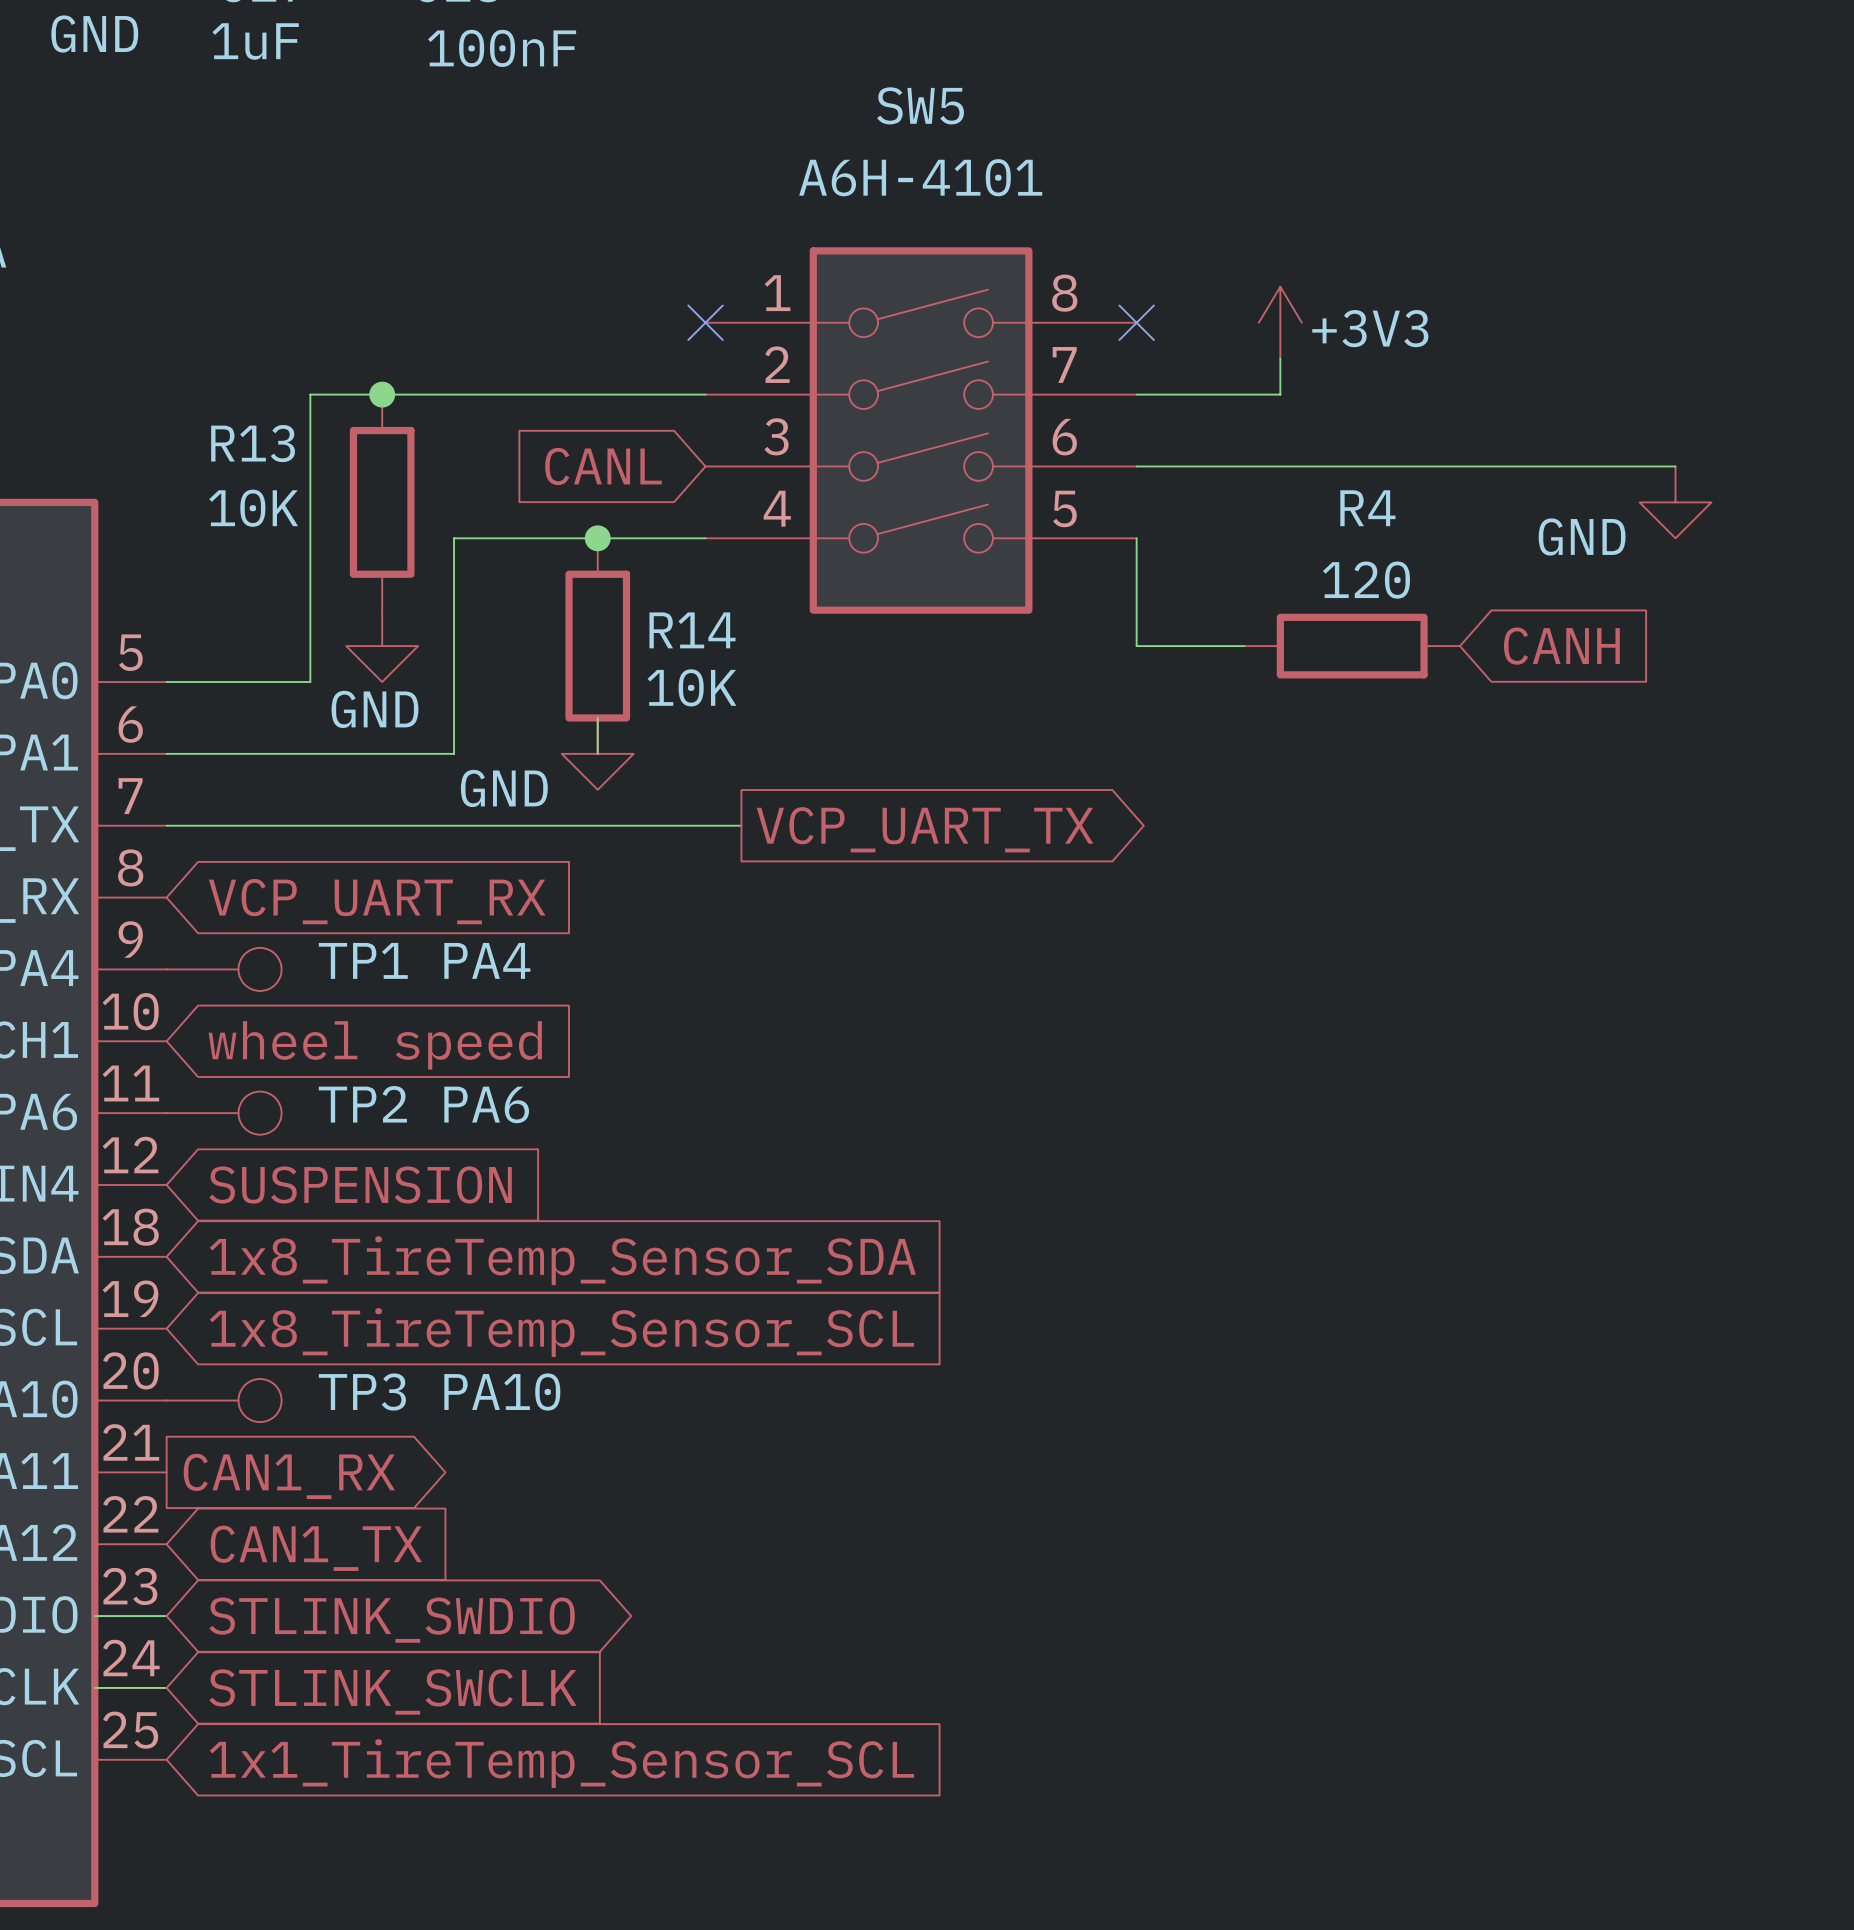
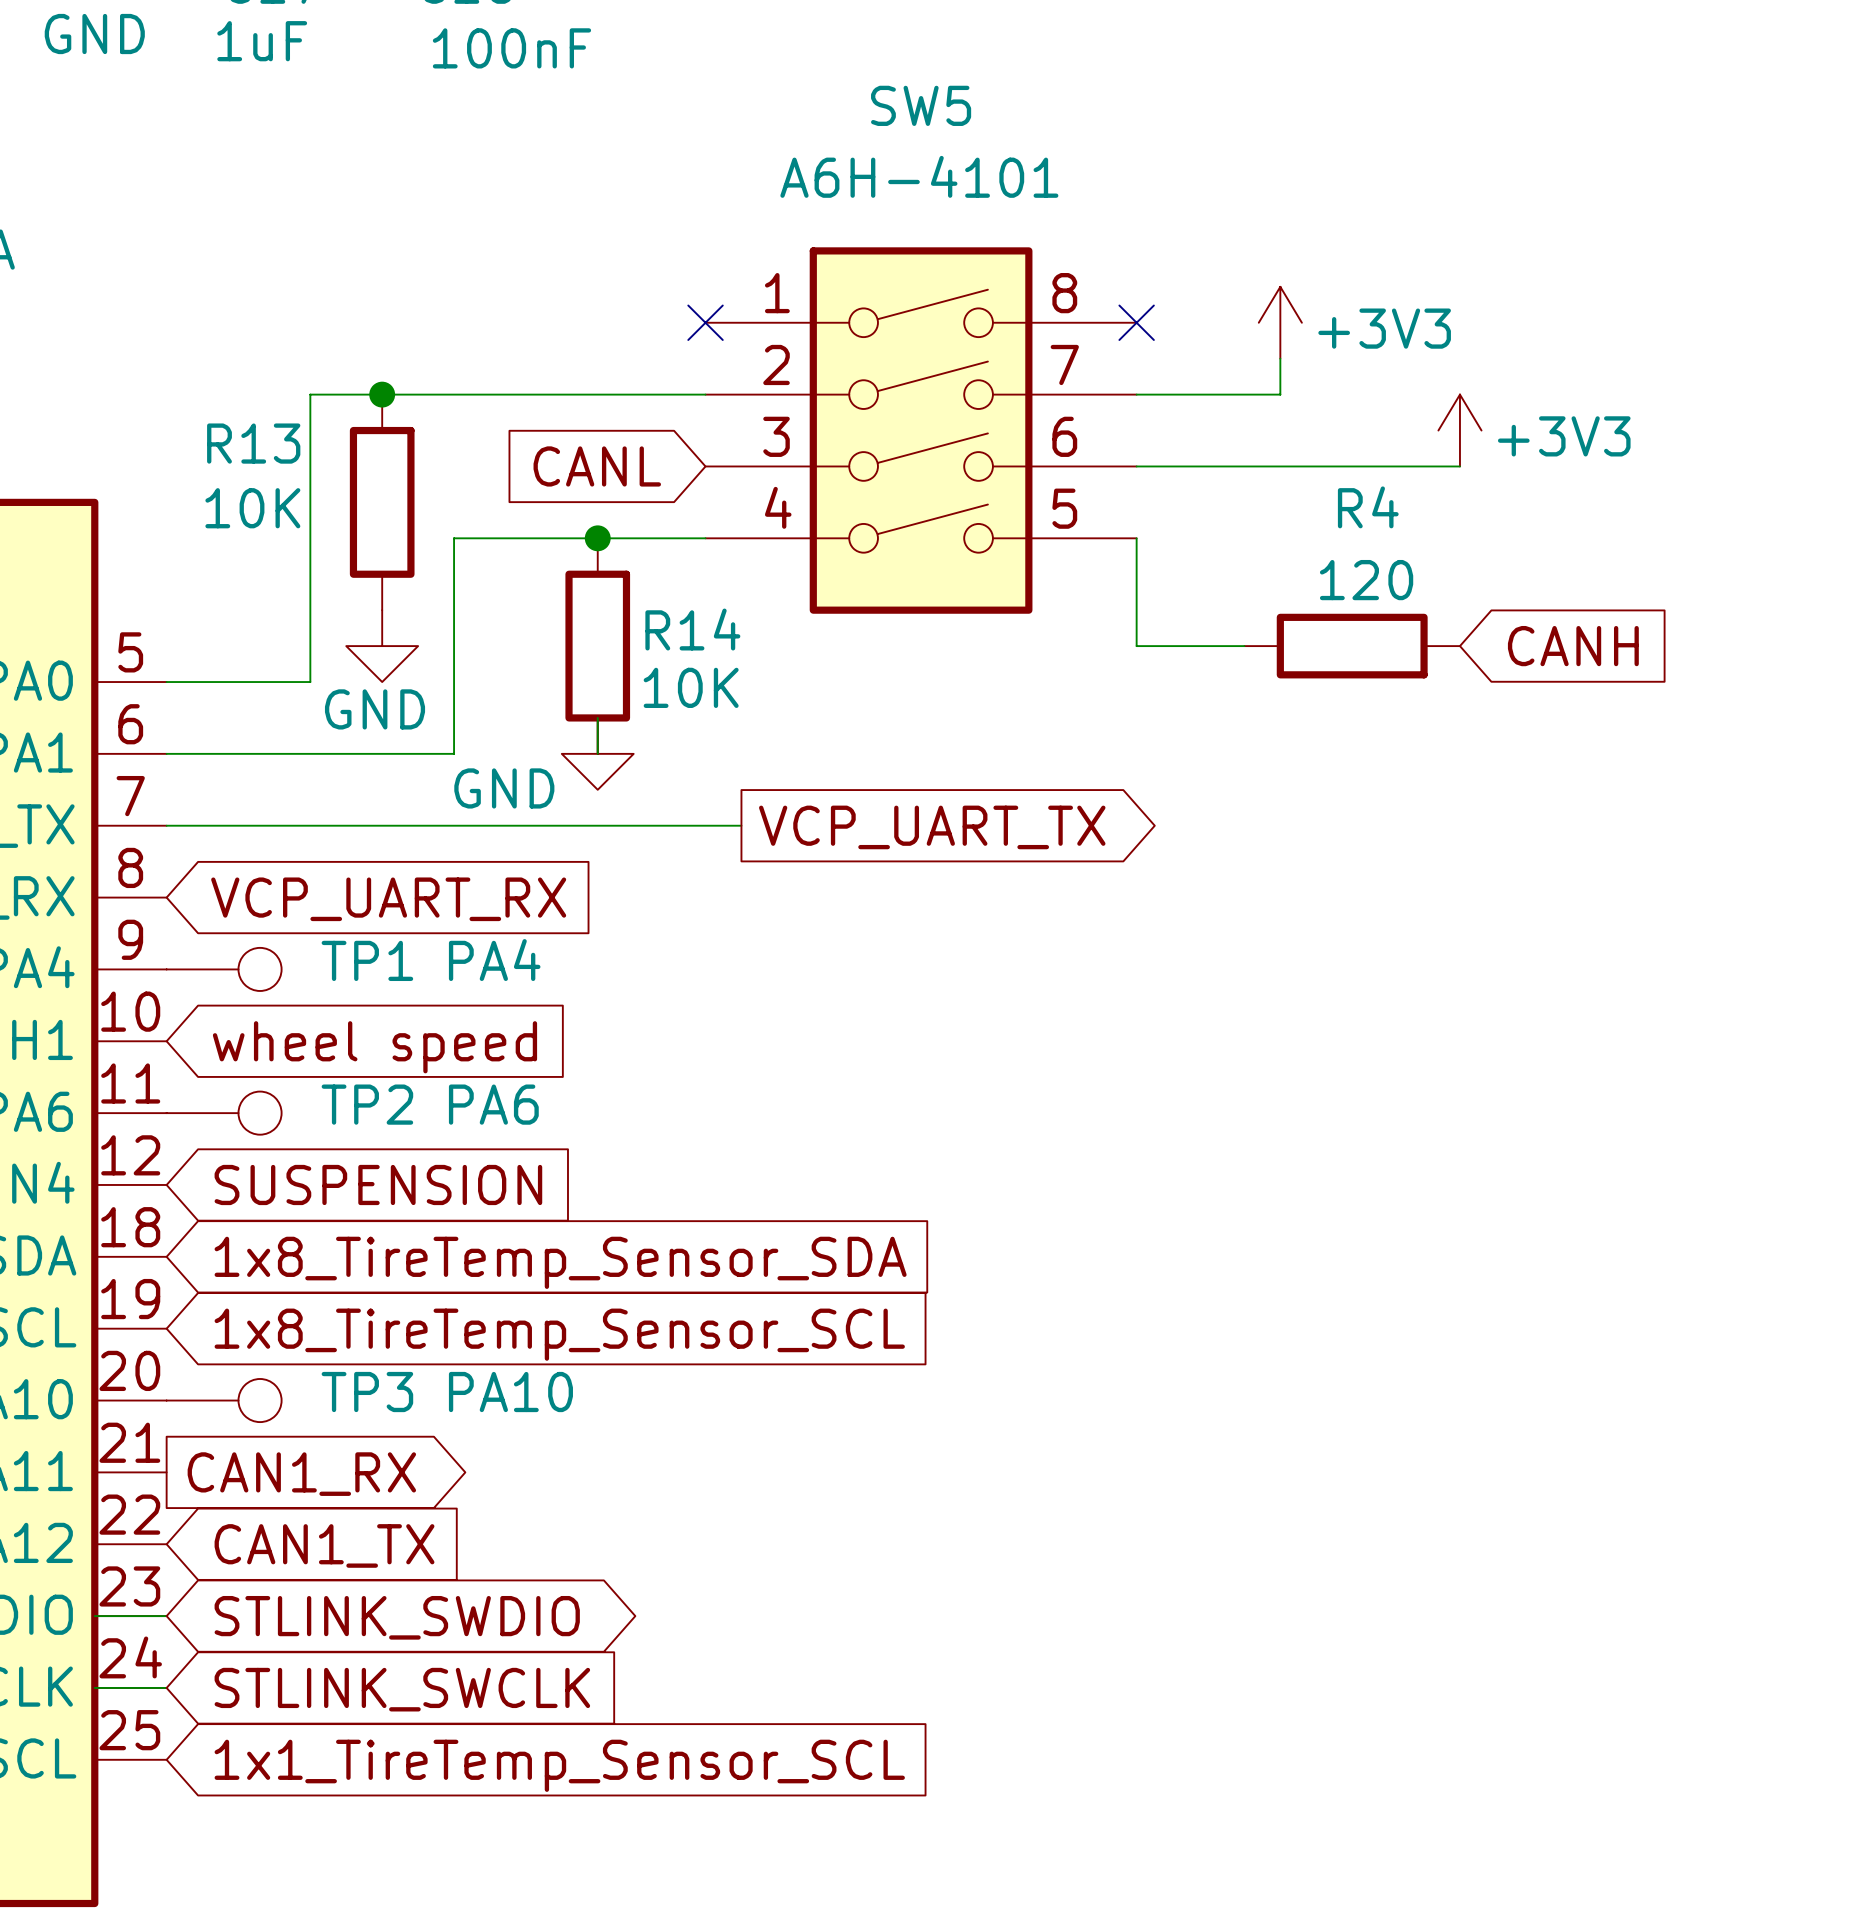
power symbol: none -> +3V3 (1459, 430)
wire: (1459, 466) (1675, 466) -> none
power symbol: GND (1675, 502) -> none

